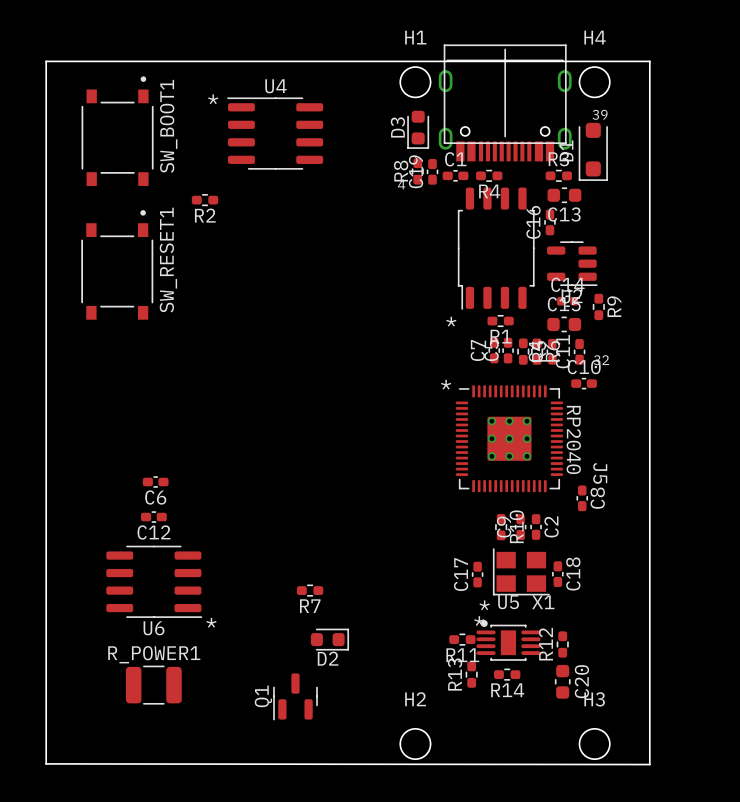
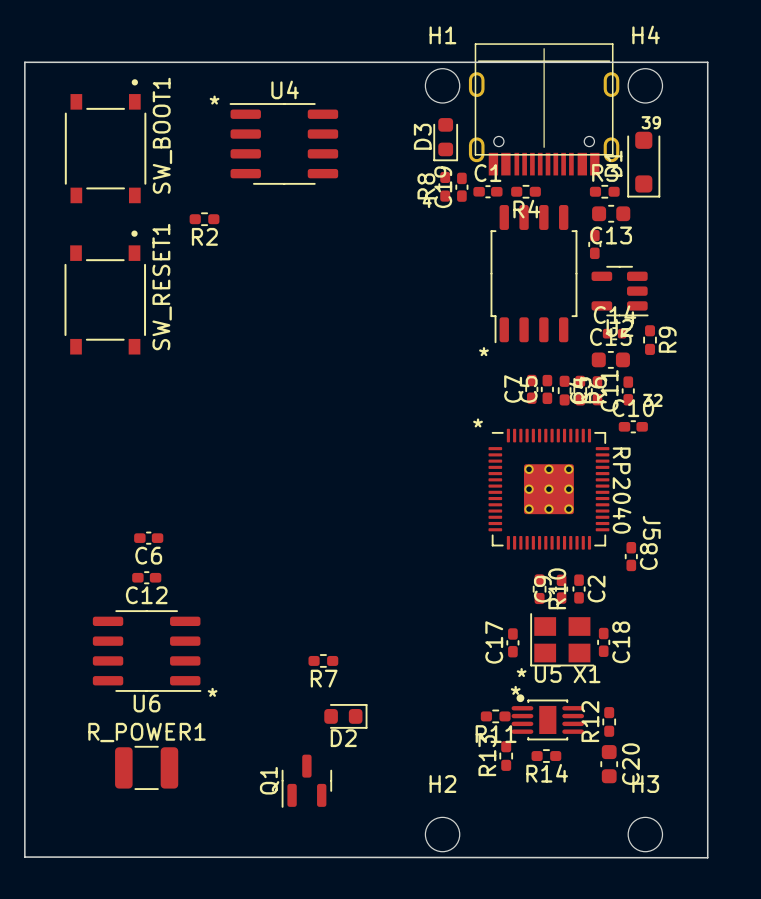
C16 name: C16 (533, 222) -> none
R1: (500, 321) -> none

